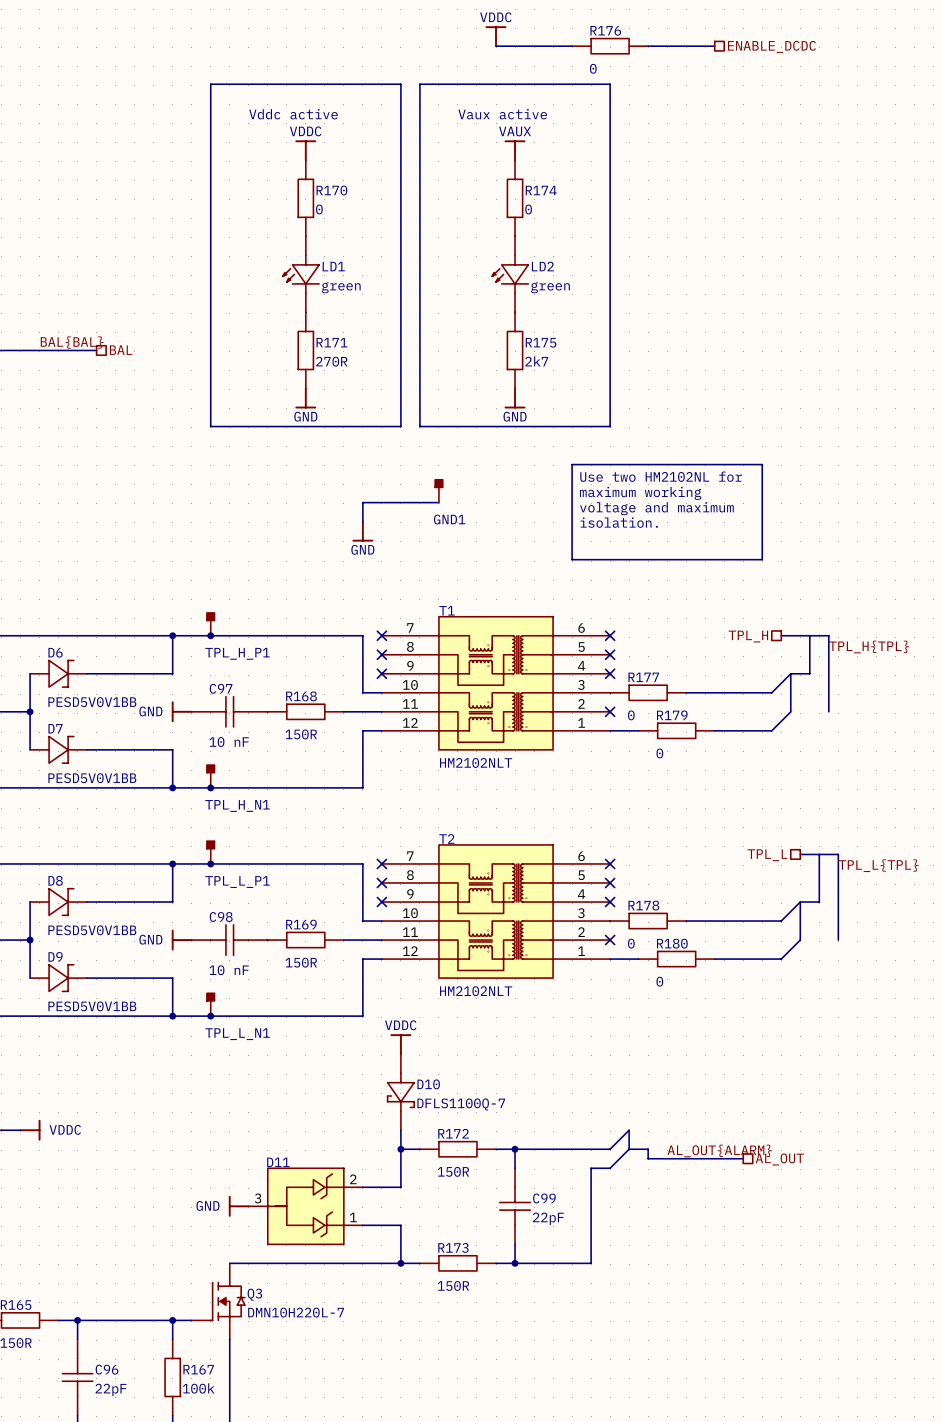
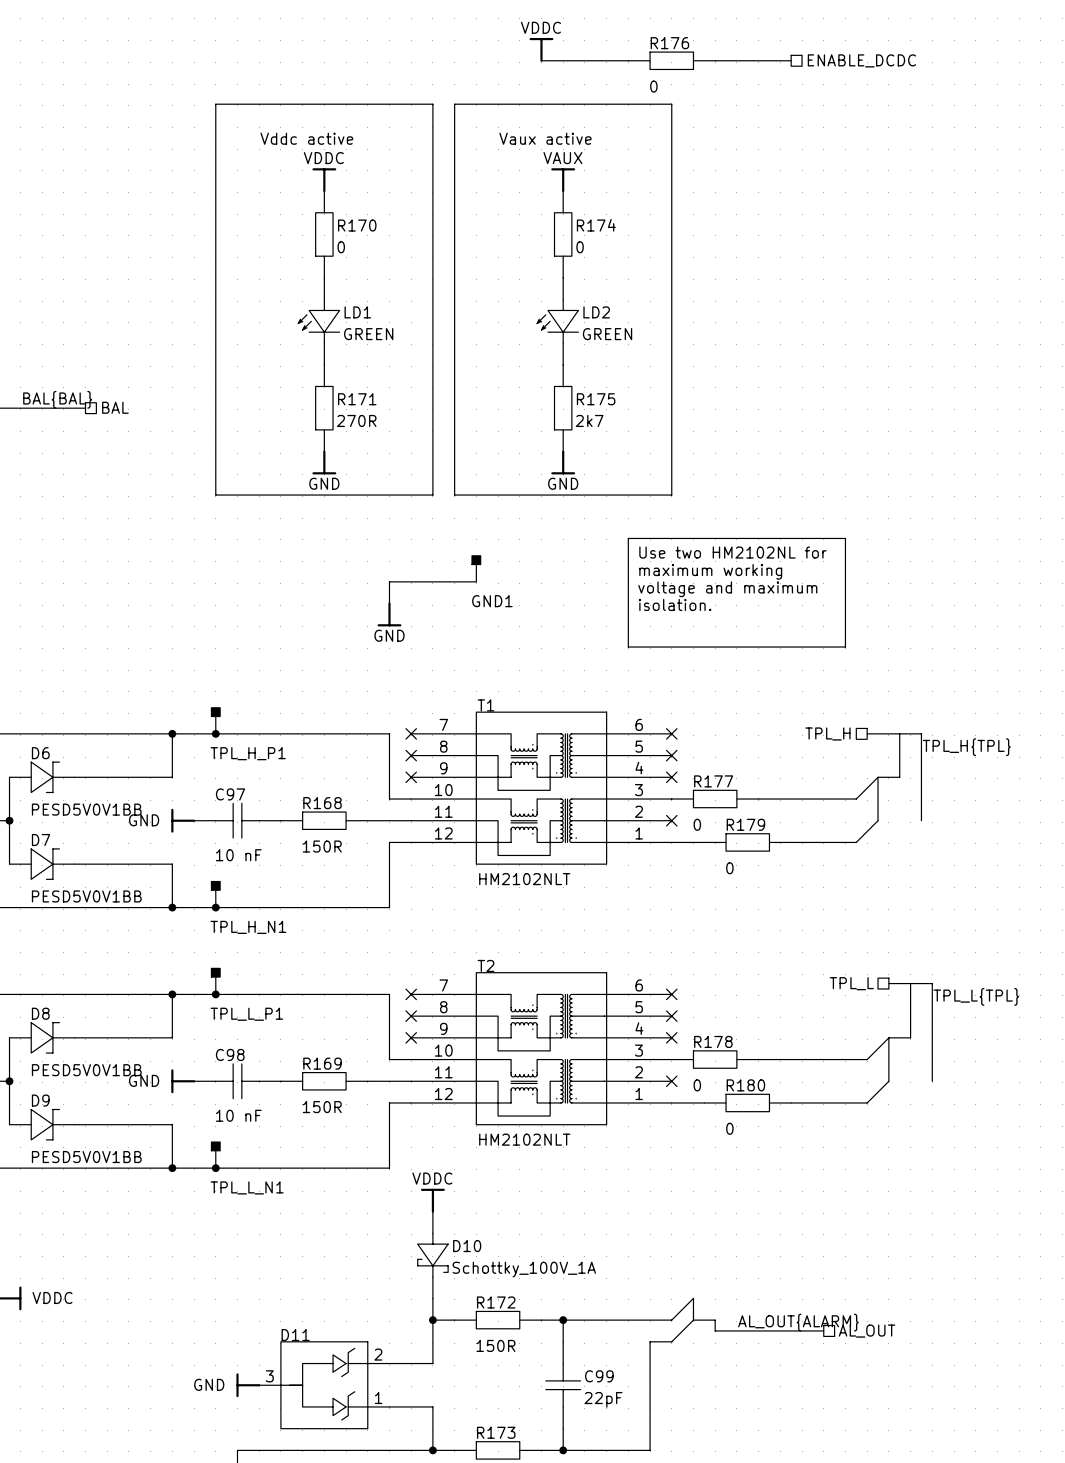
LD1 value: green (341, 287) -> GREEN (368, 334)
LD2 value: green (550, 287) -> GREEN (607, 334)
D10 value: DFLS1100Q-7 (461, 1104) -> Schottky_100V_1A (524, 1269)

